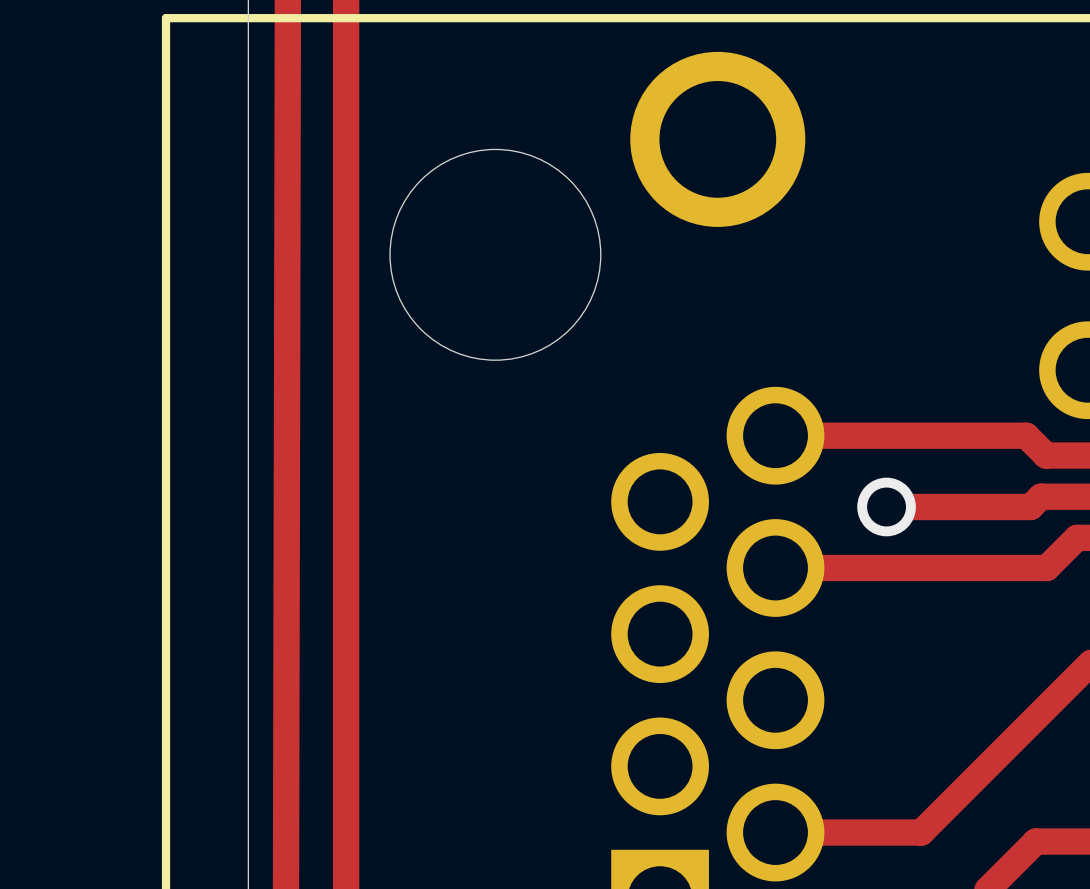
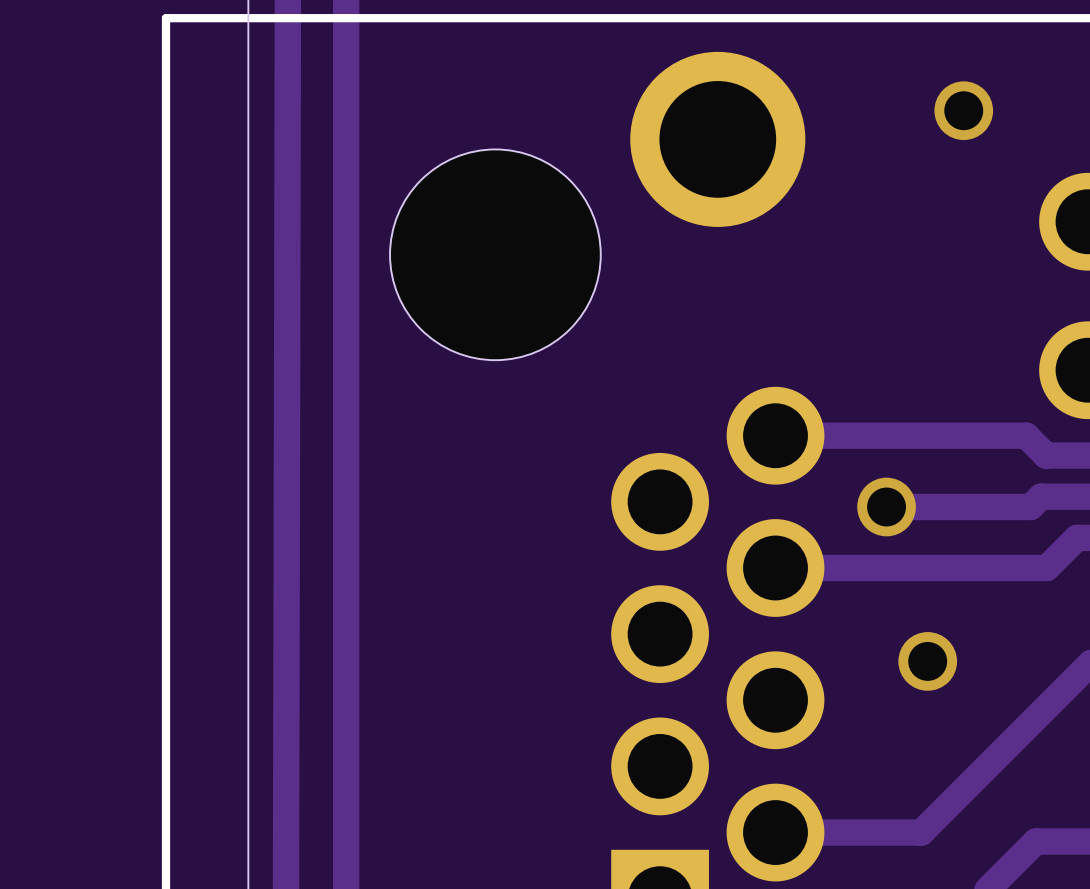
via: none -> (963, 110)
via: none -> (927, 661)

